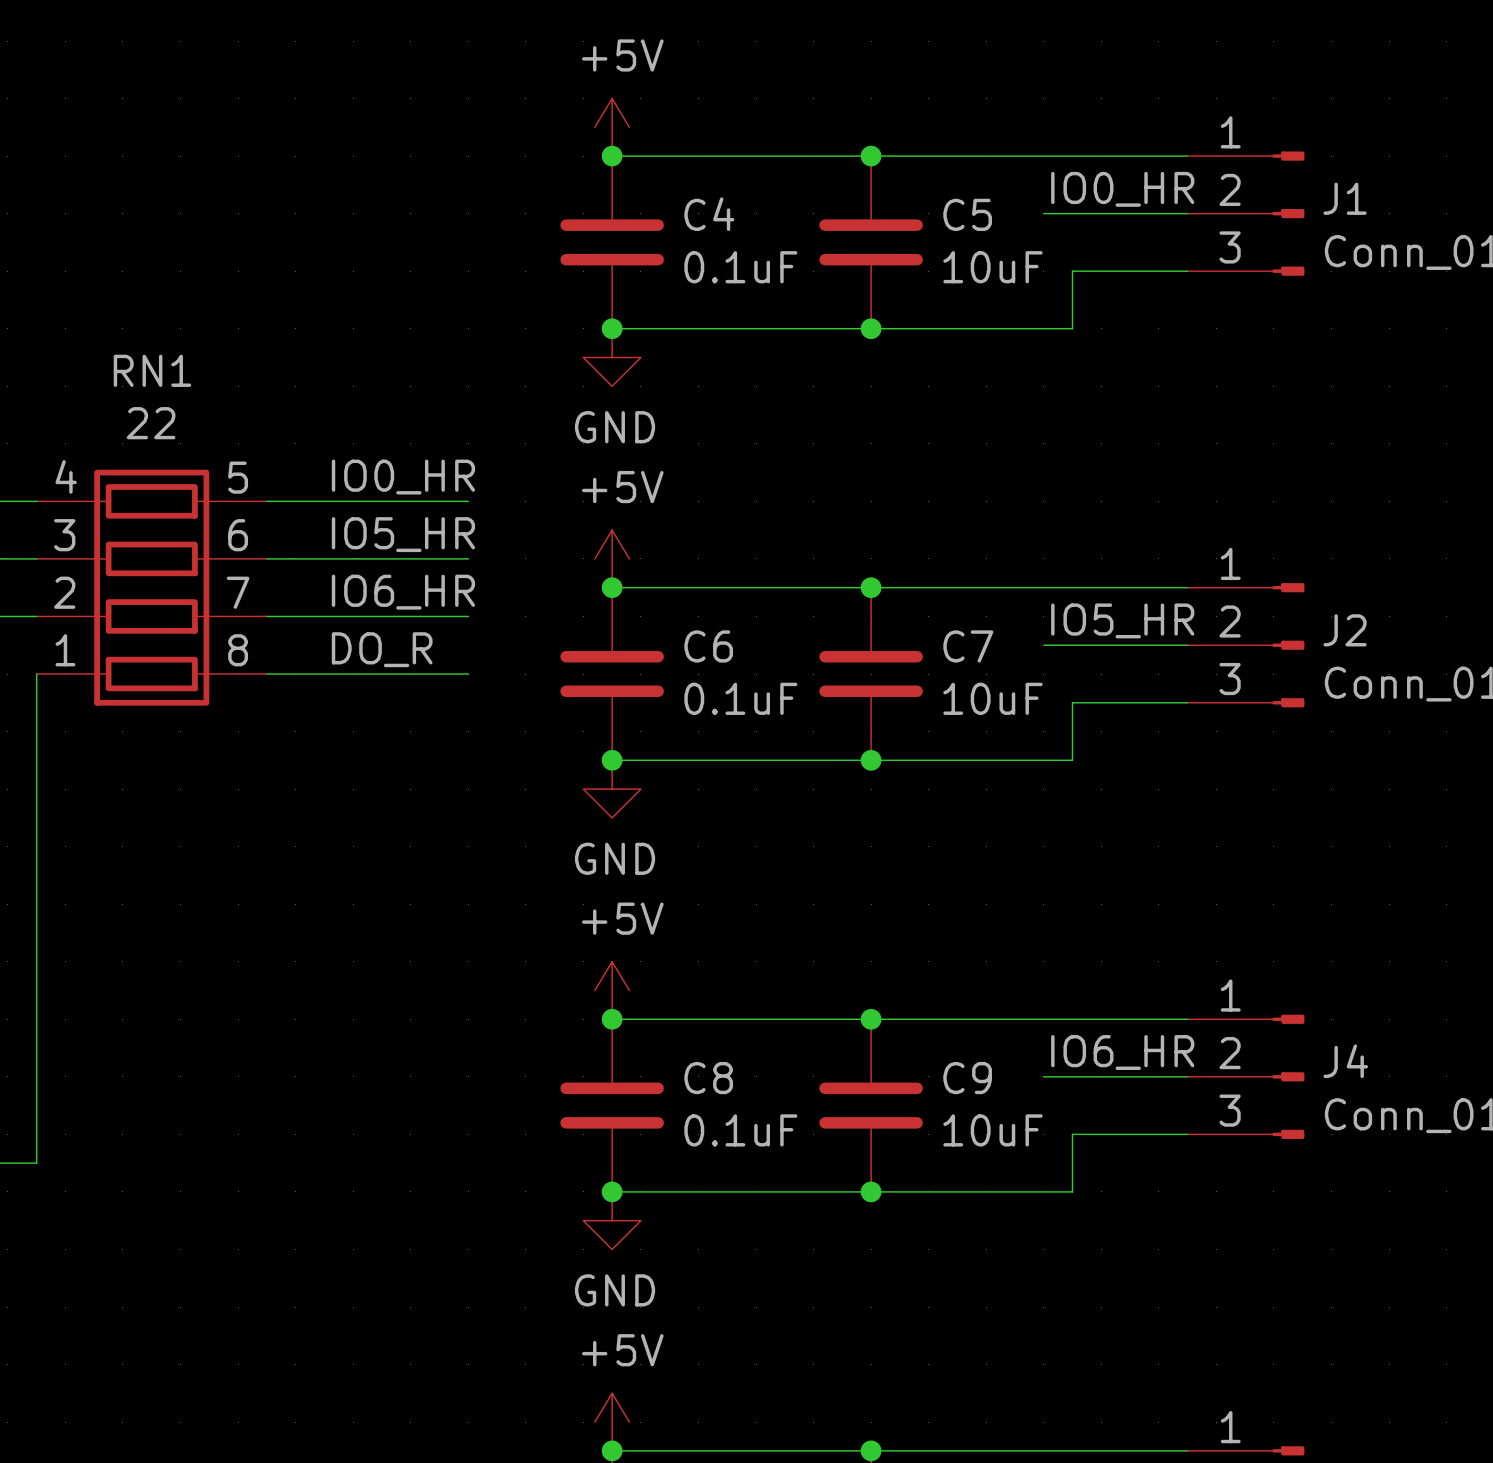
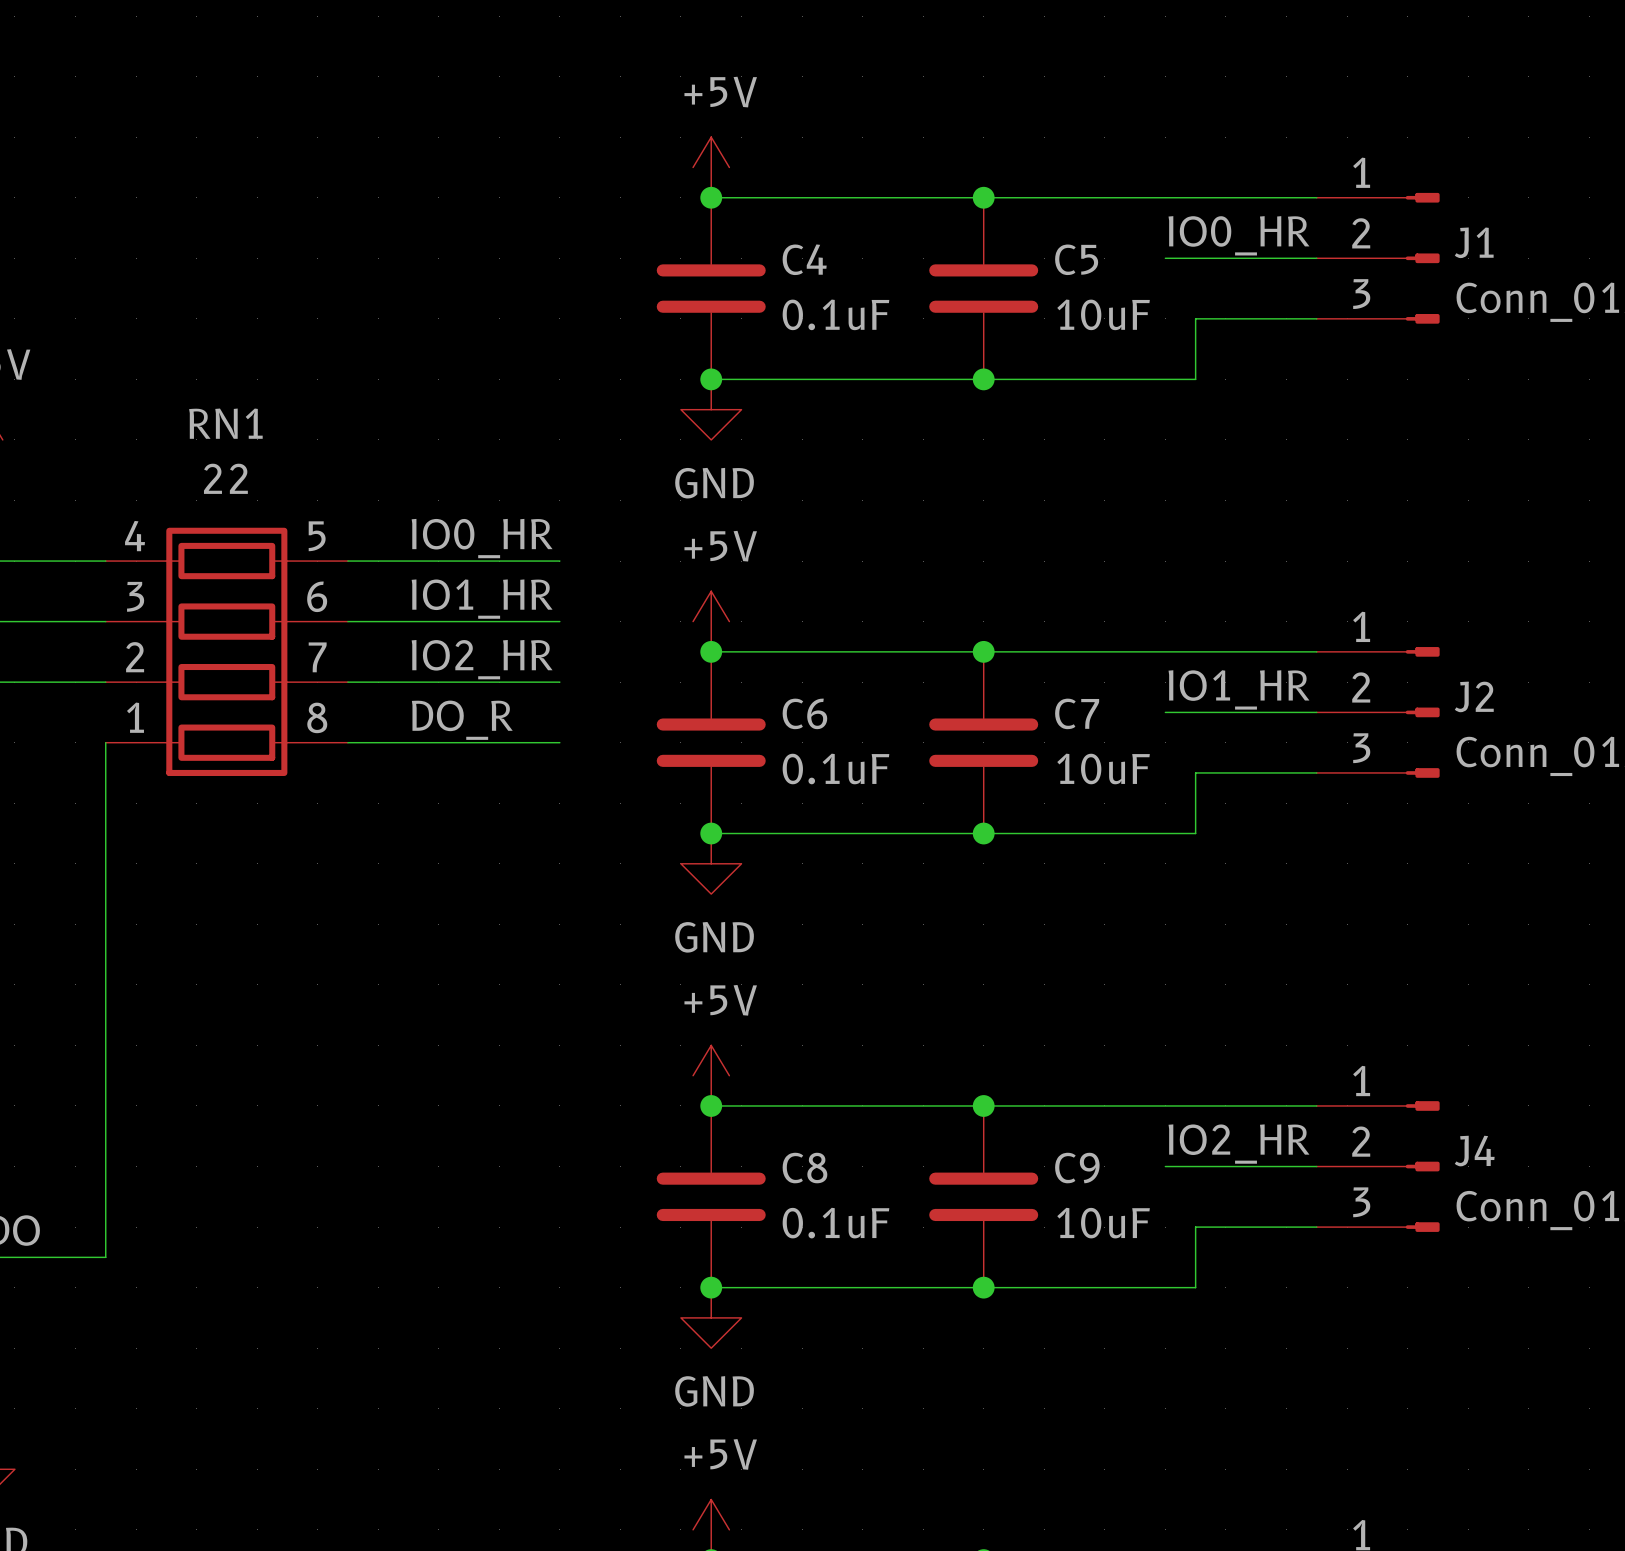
label: IO5_HR (403, 534) -> IO1_HR (482, 599)
label: IO6_HR (403, 592) -> IO2_HR (482, 659)
label: IO5_HR (1122, 620) -> IO1_HR (1238, 689)
label: IO6_HR (1122, 1052) -> IO2_HR (1238, 1144)

